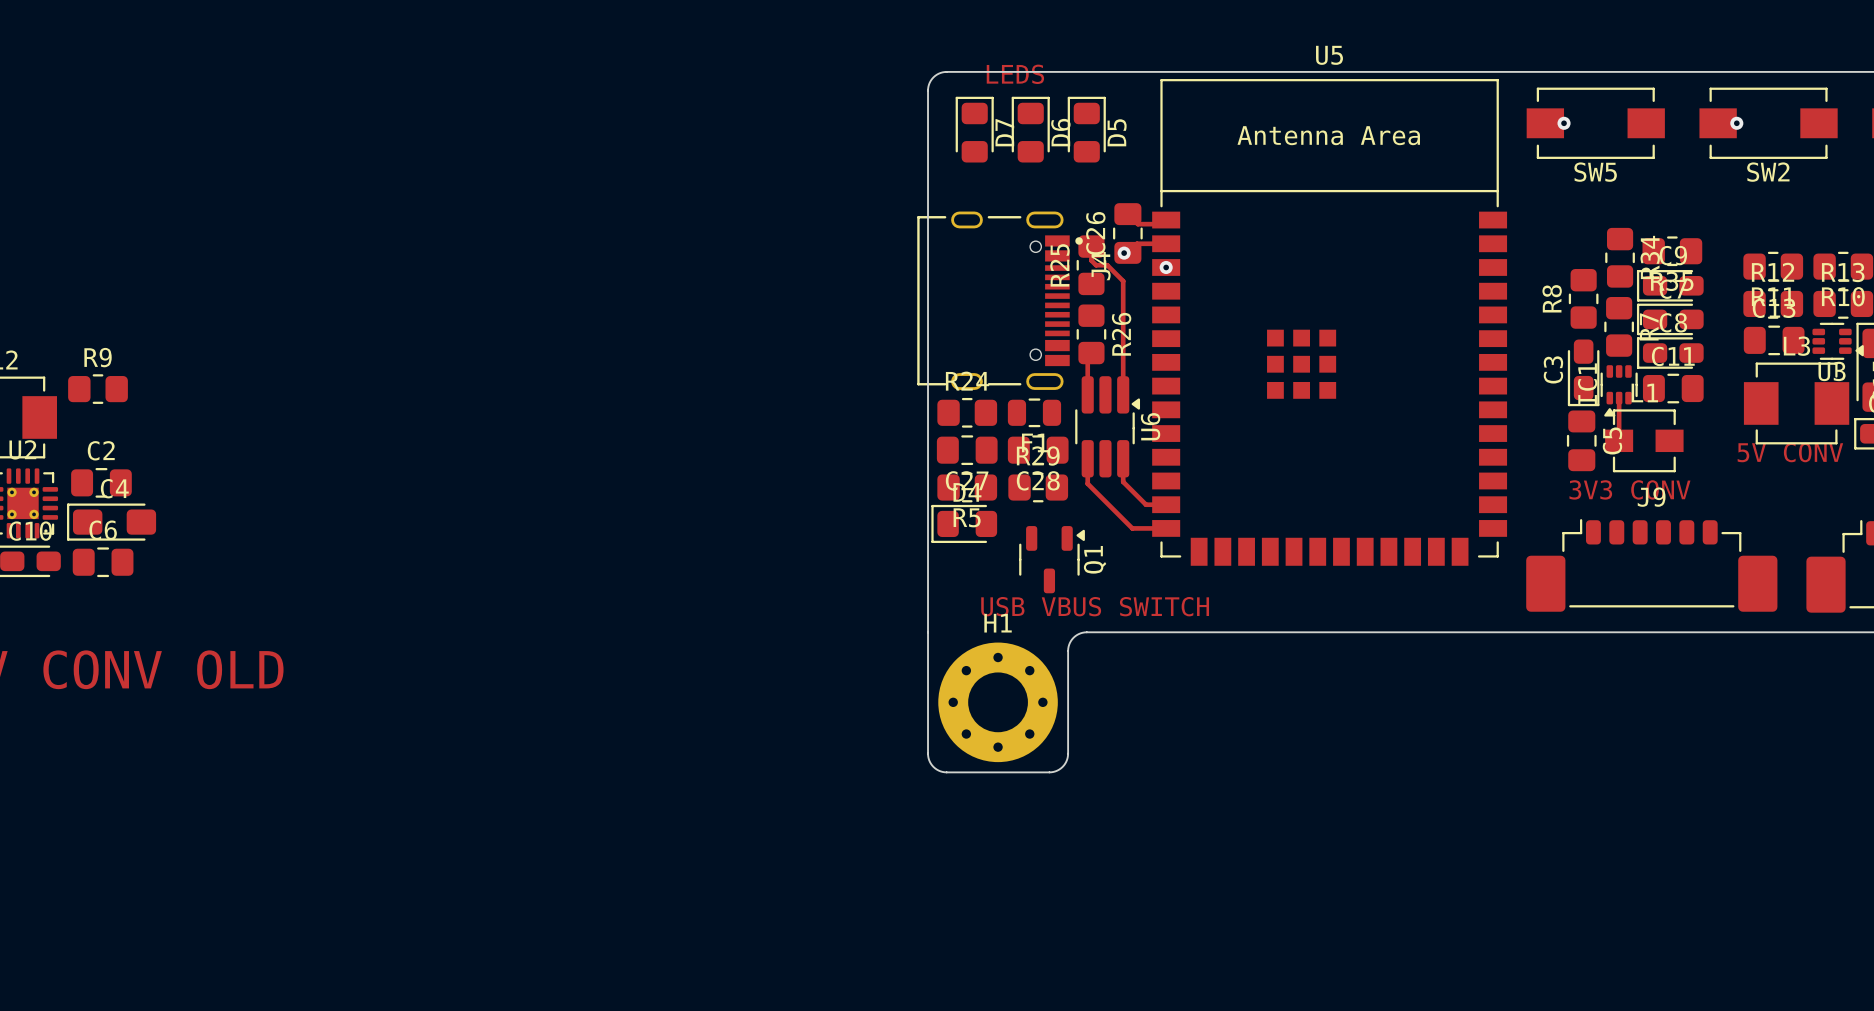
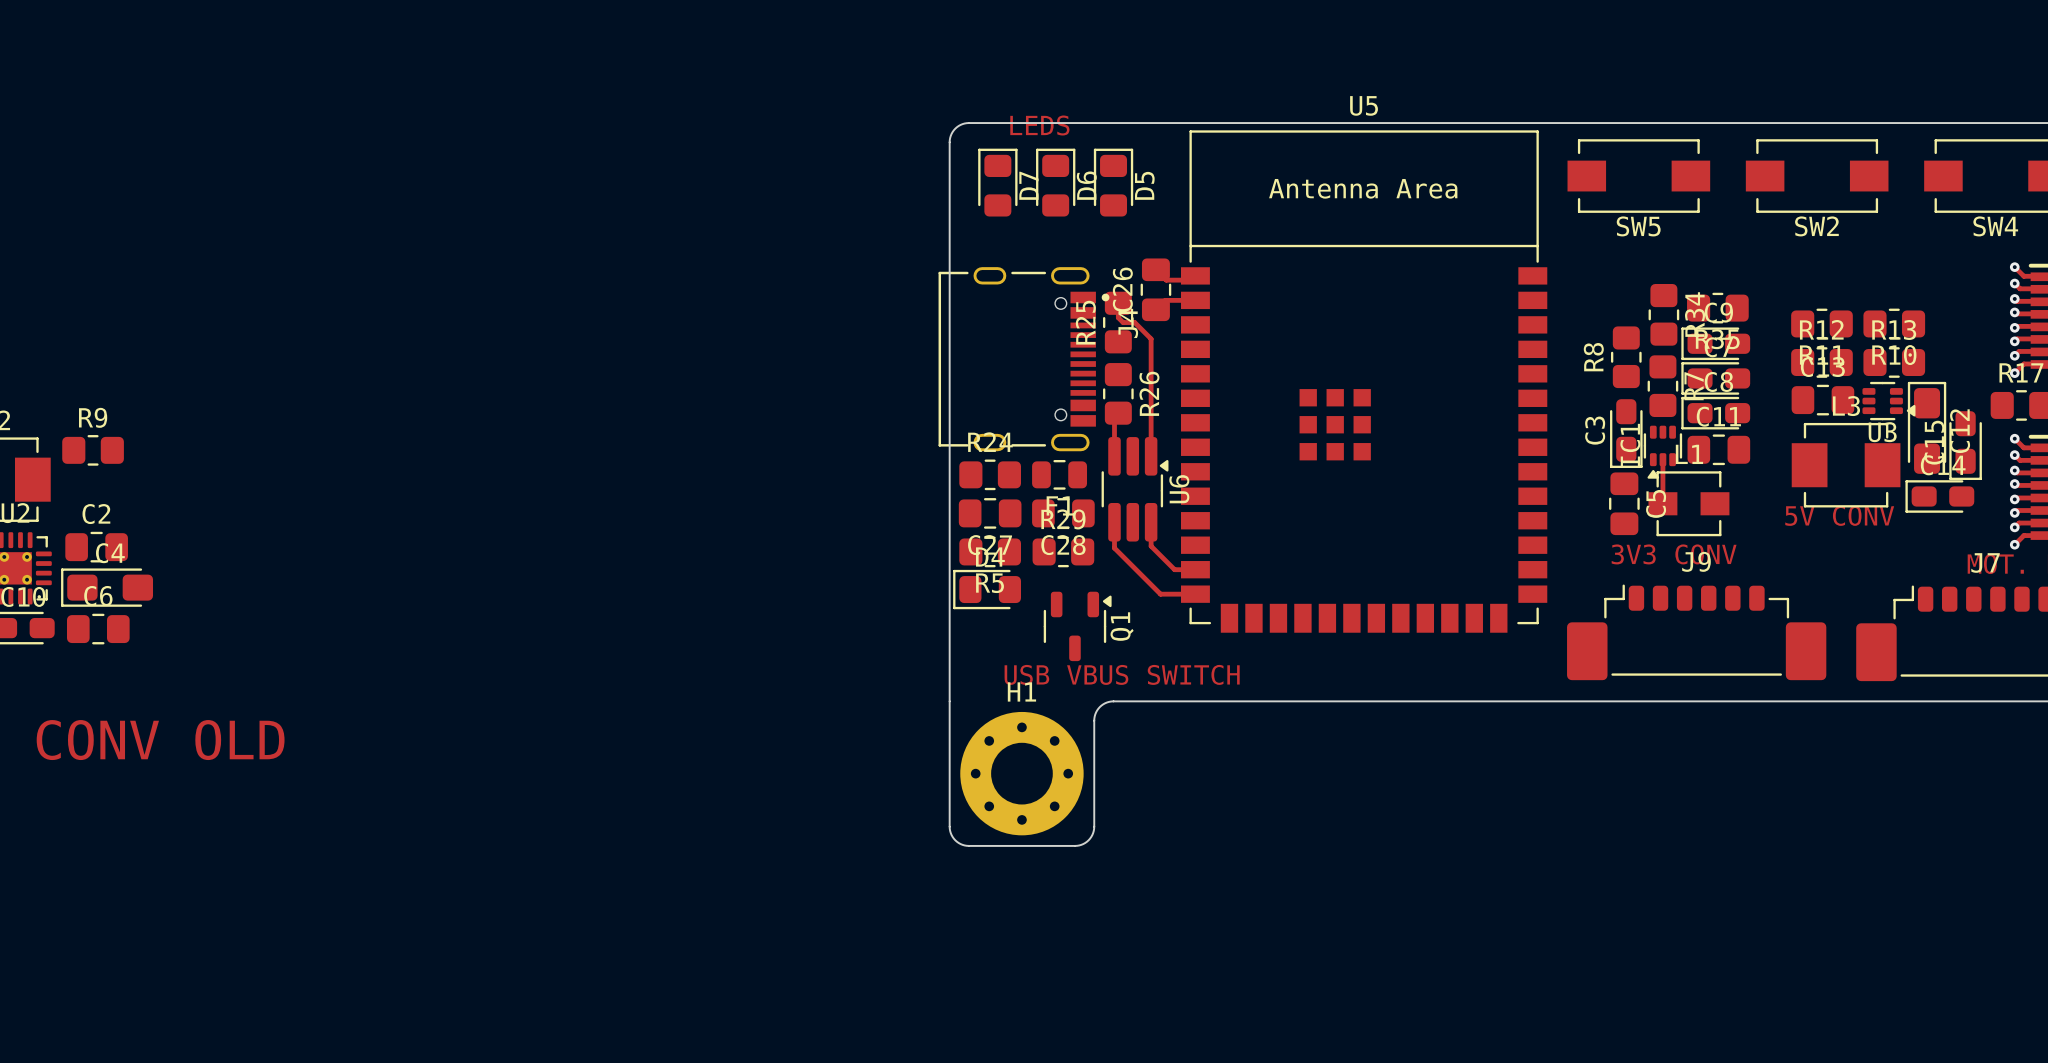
via: (1564, 123) -> none
via: (1736, 123) -> none
via: (1124, 253) -> none
via: (1166, 267) -> none

